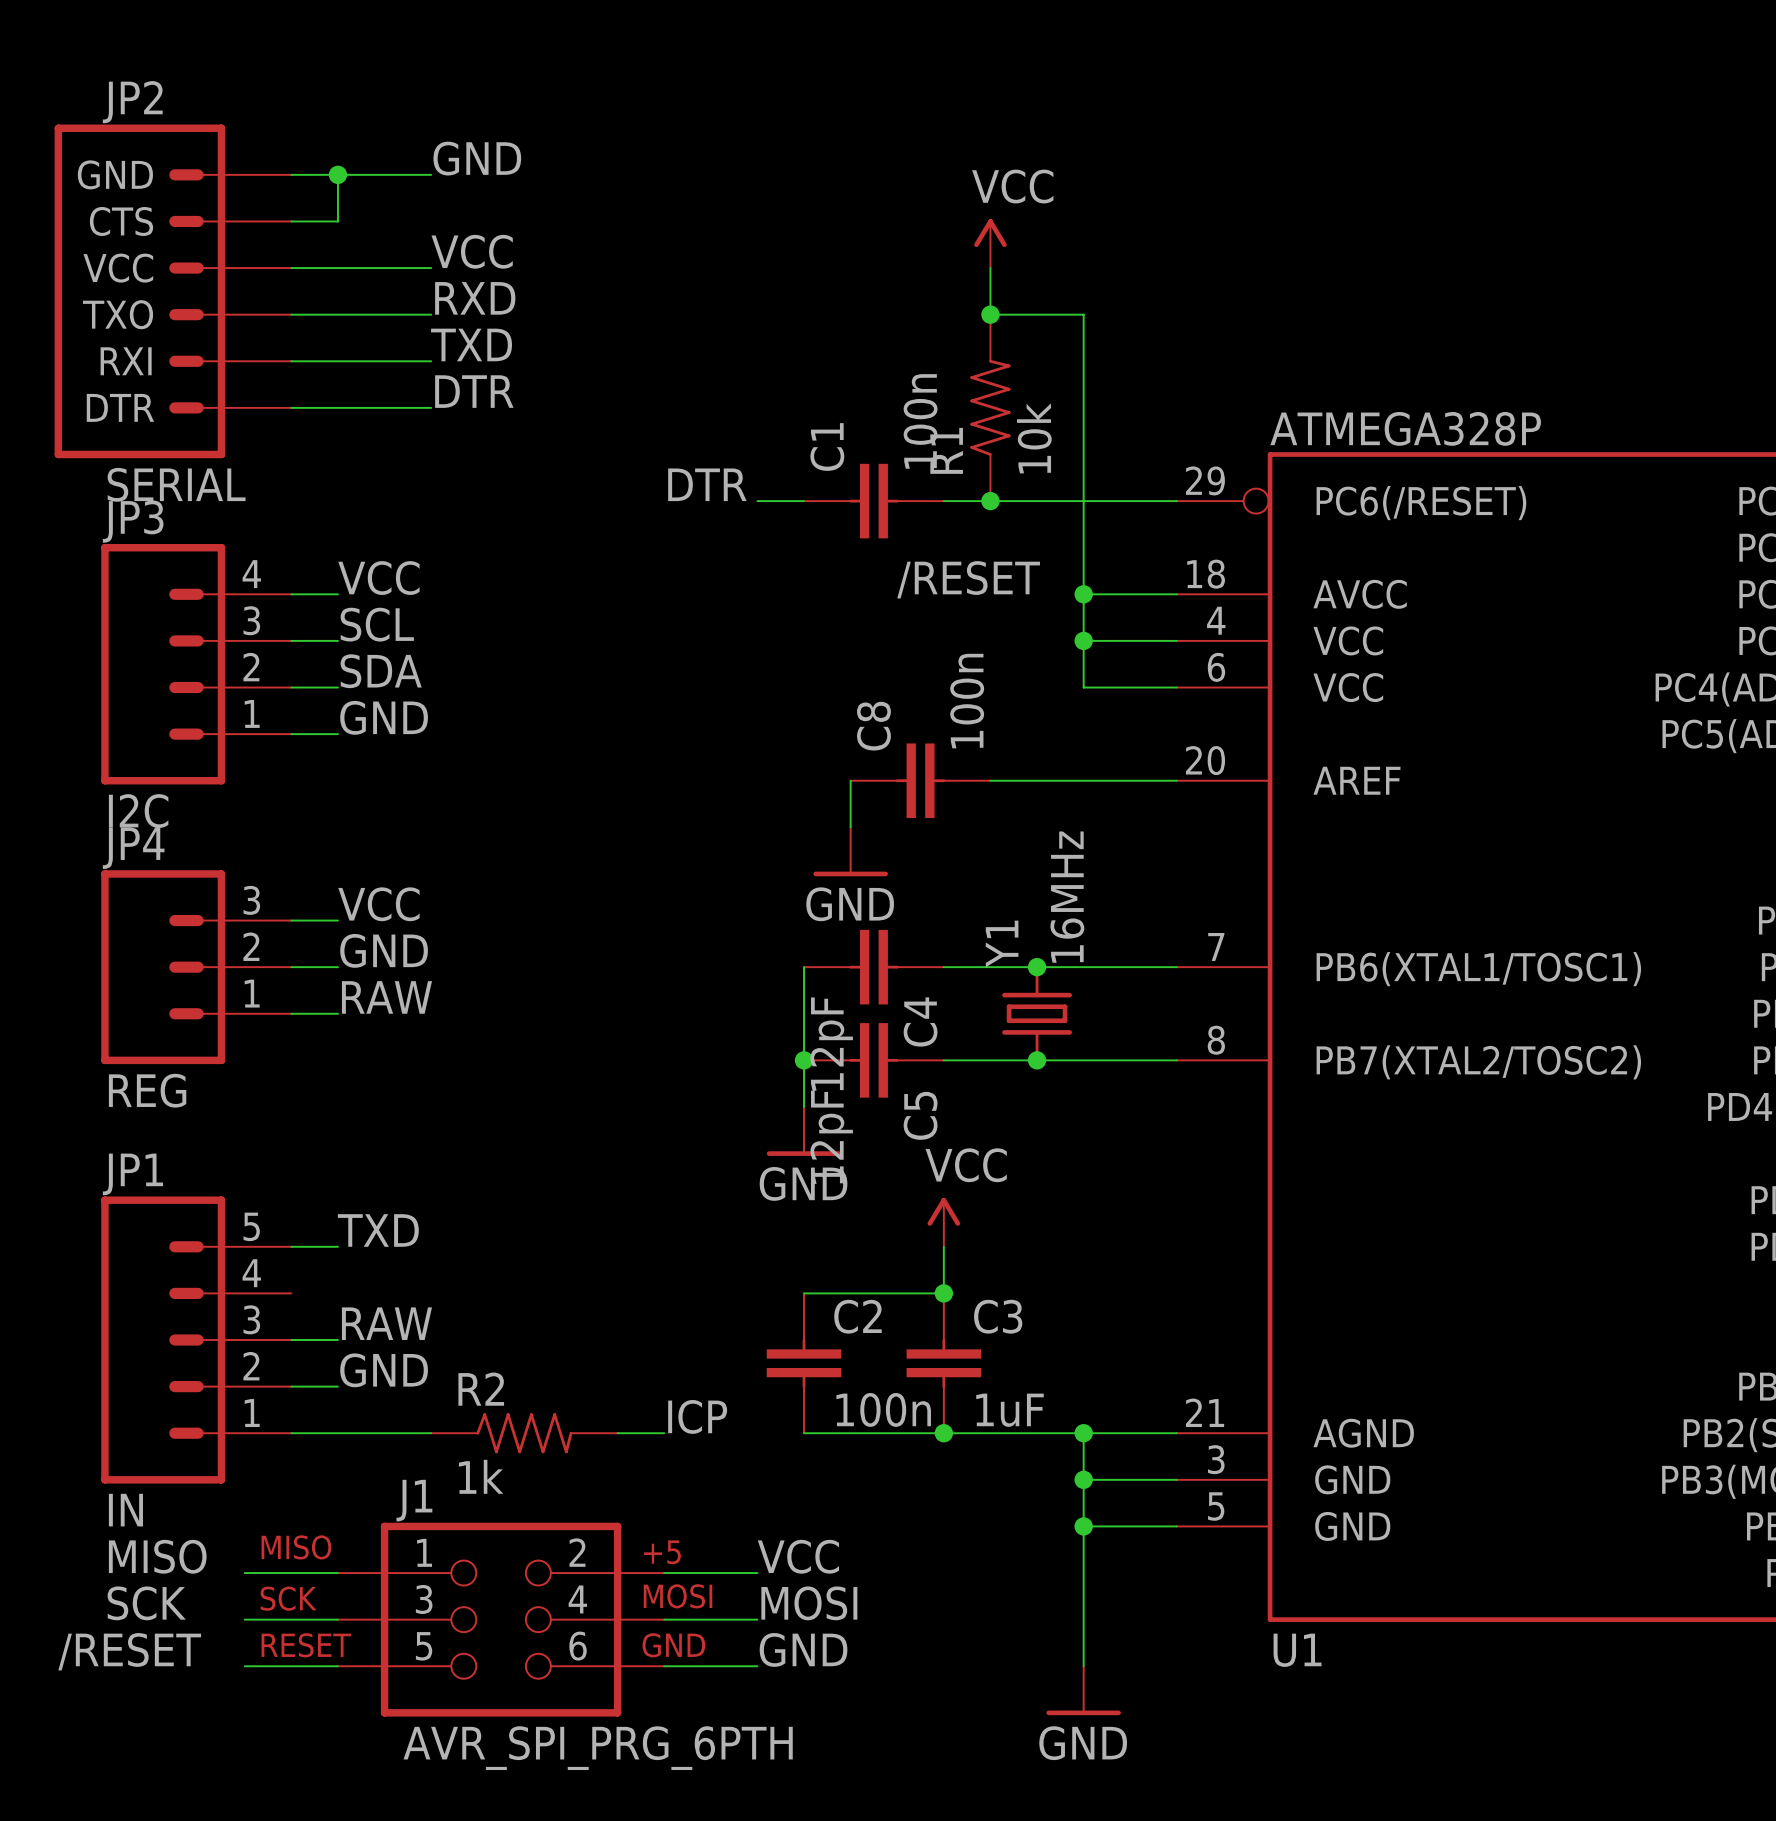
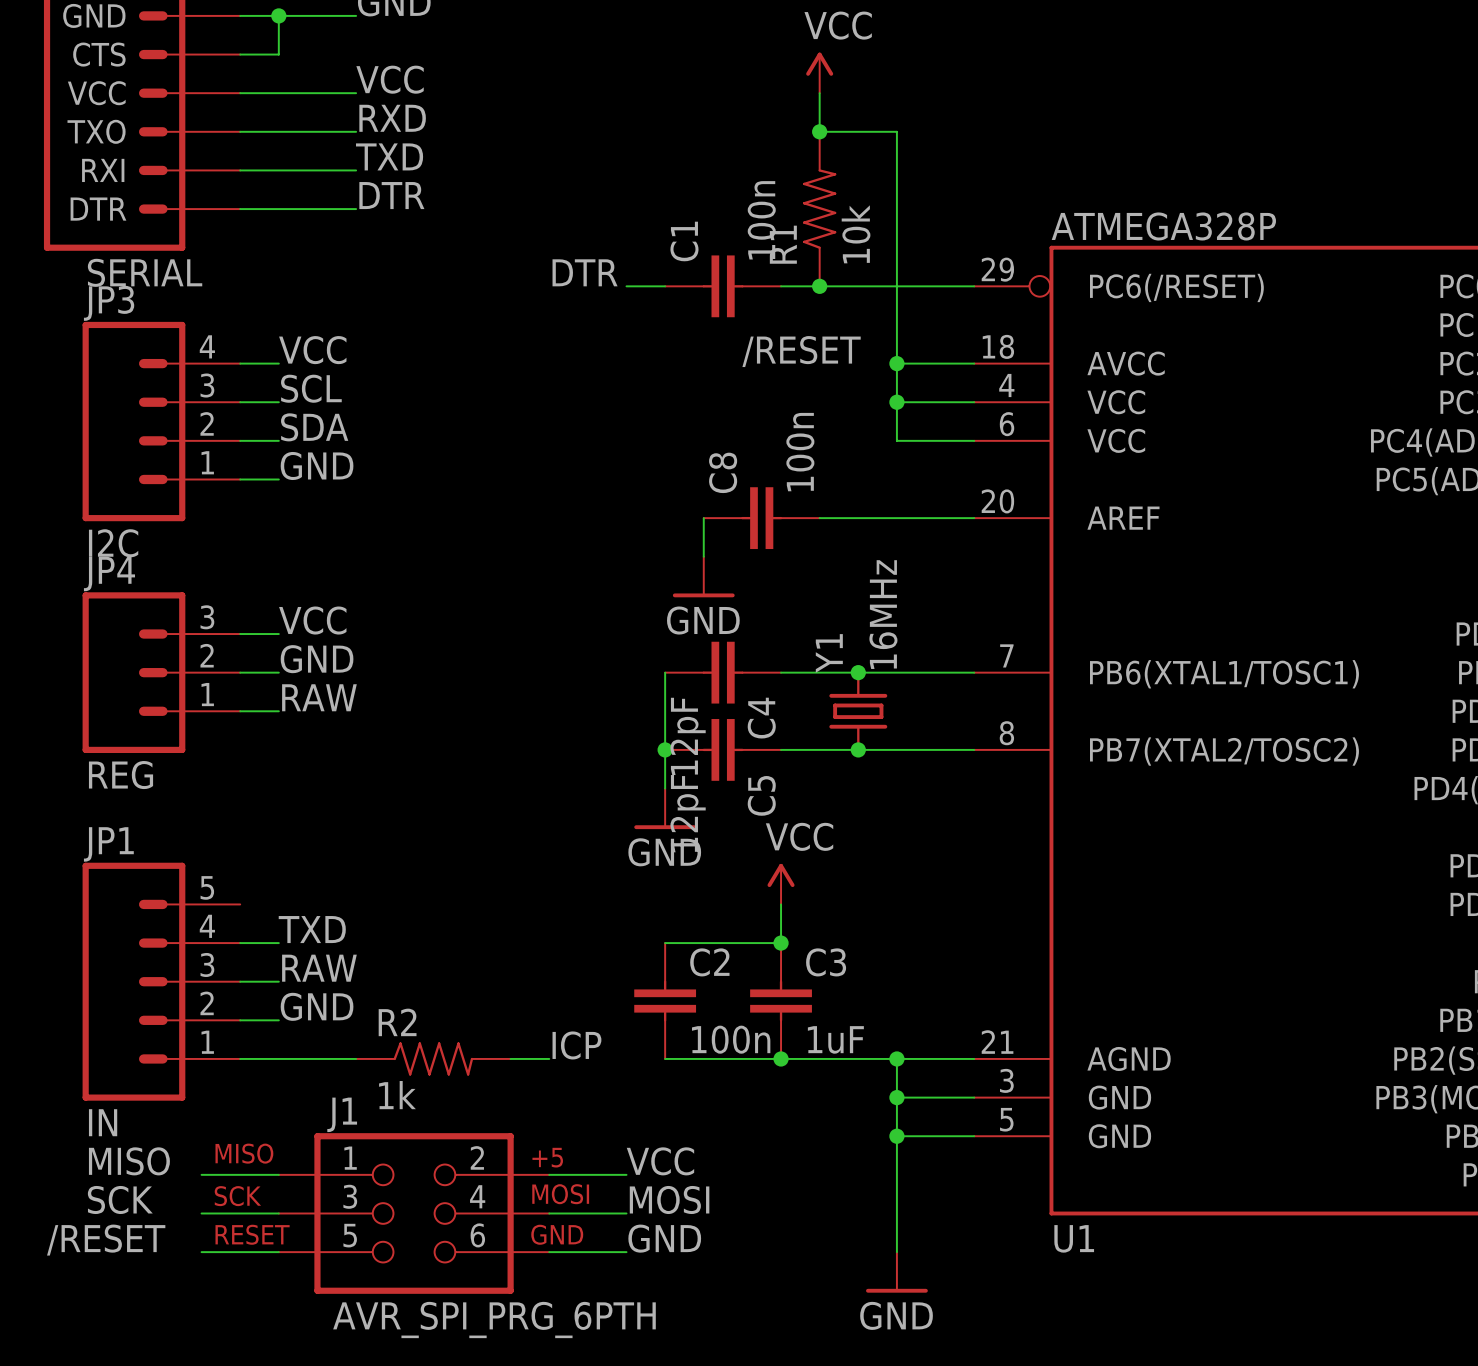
label position: TXD (378, 1230) -> TXD (312, 929)
wire: (291, 1246) (337, 1246) -> (240, 943) (278, 943)

